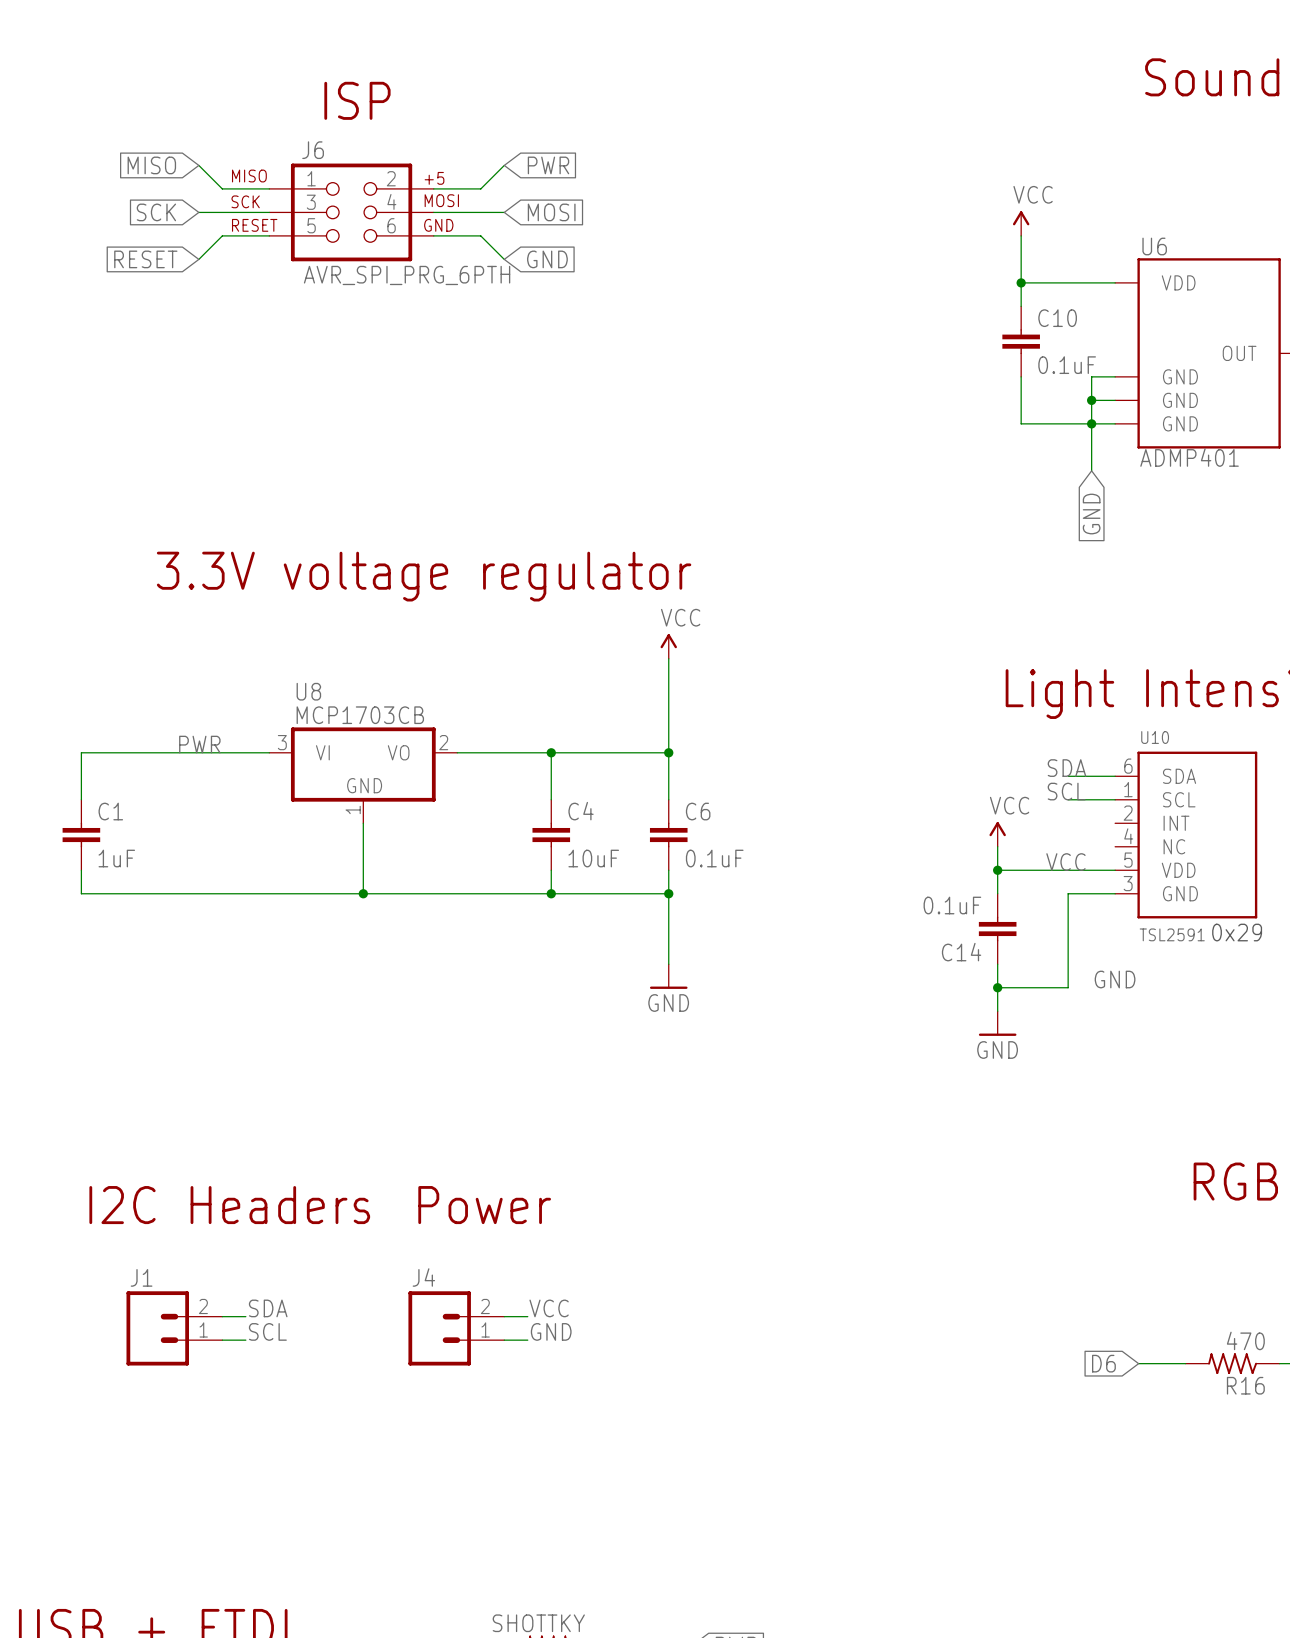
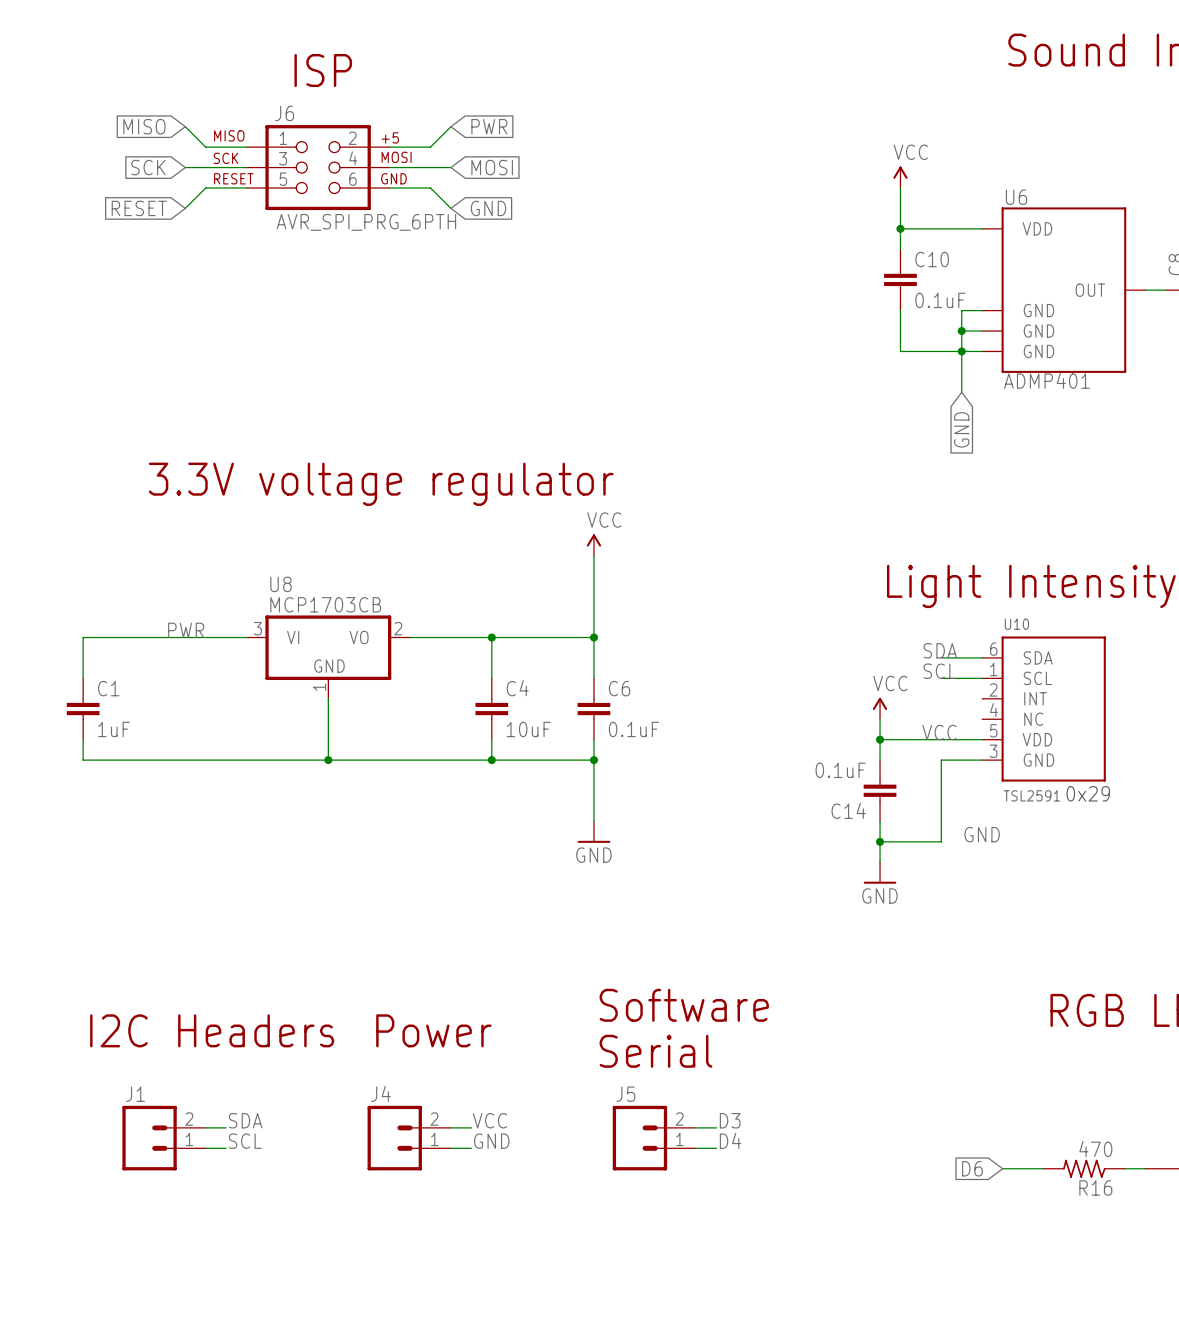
text: none -> Software (684, 1005)
text: none -> Serial (656, 1051)
label: none -> D3 (730, 1120)
wire: none -> (696, 1127) (716, 1127)
J5: none -> (654, 1138)
label: none -> D4 (730, 1140)
wire: none -> (696, 1148) (716, 1148)

